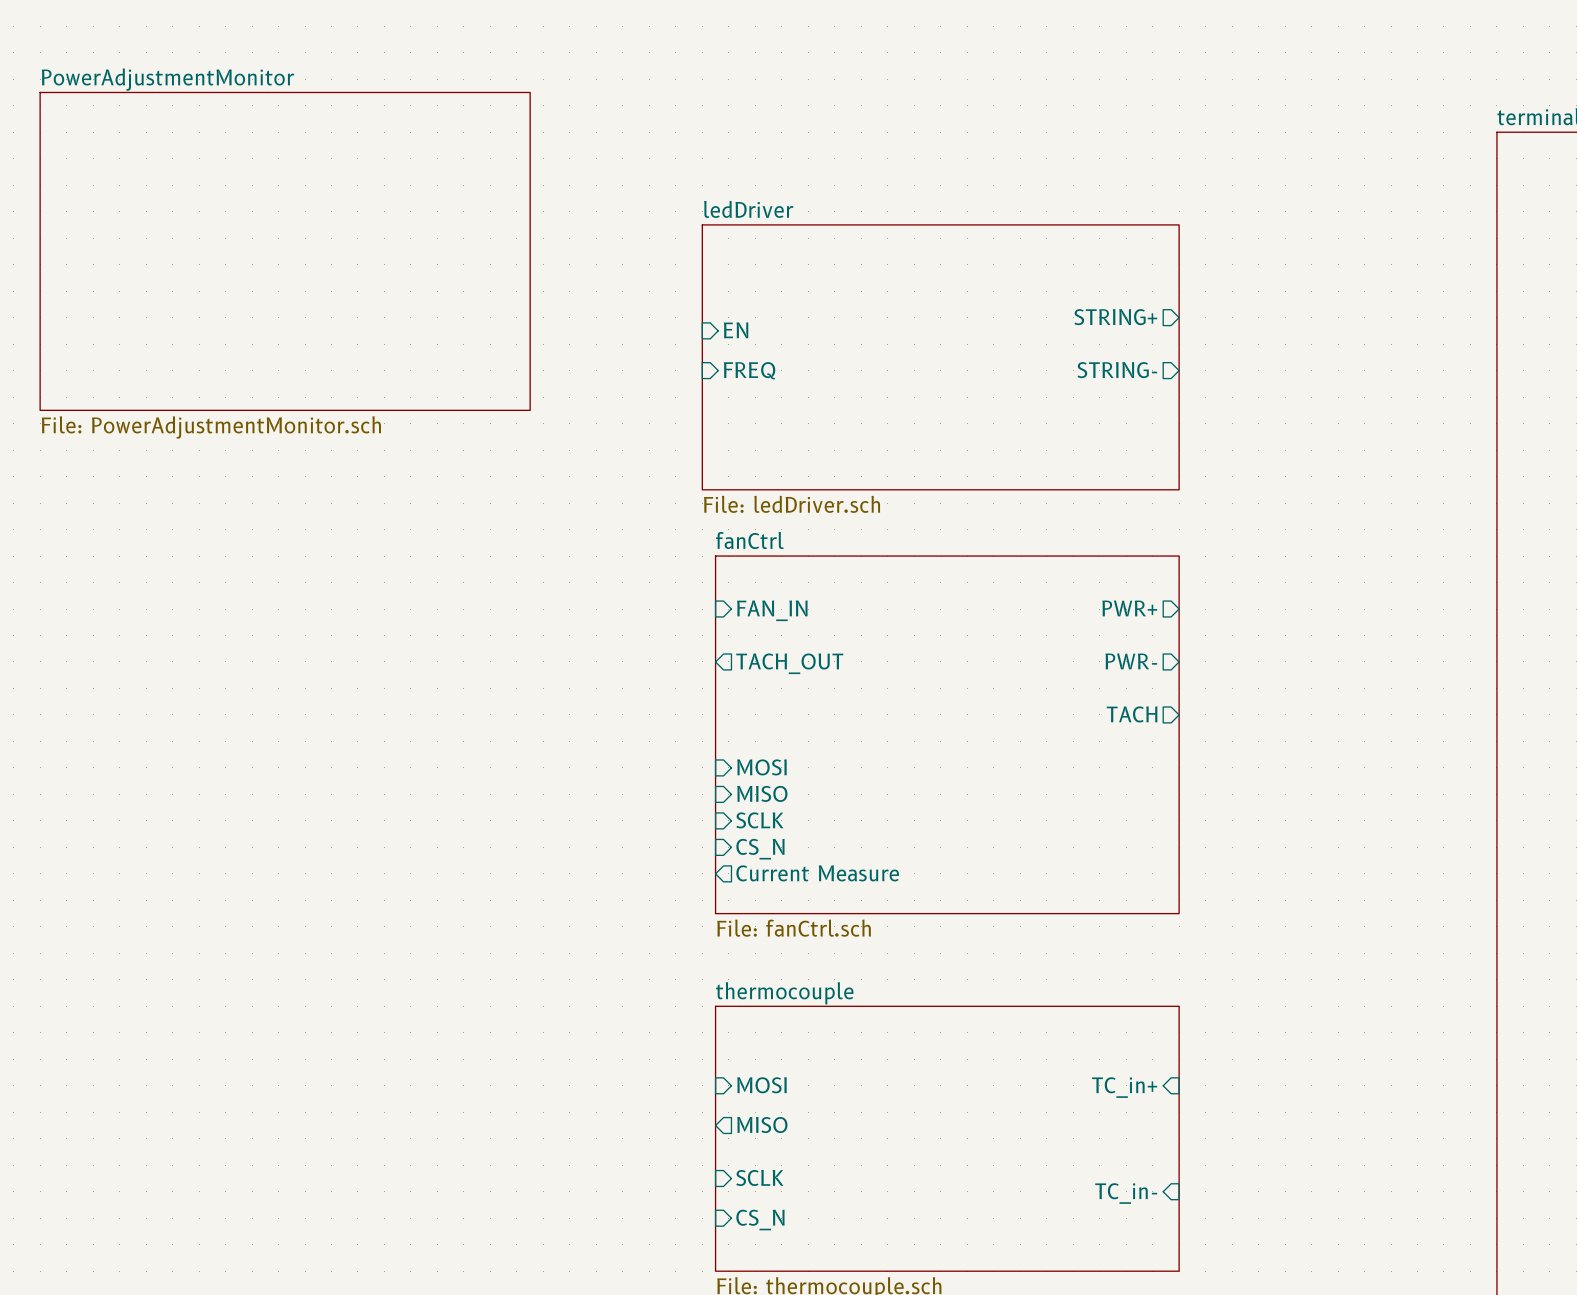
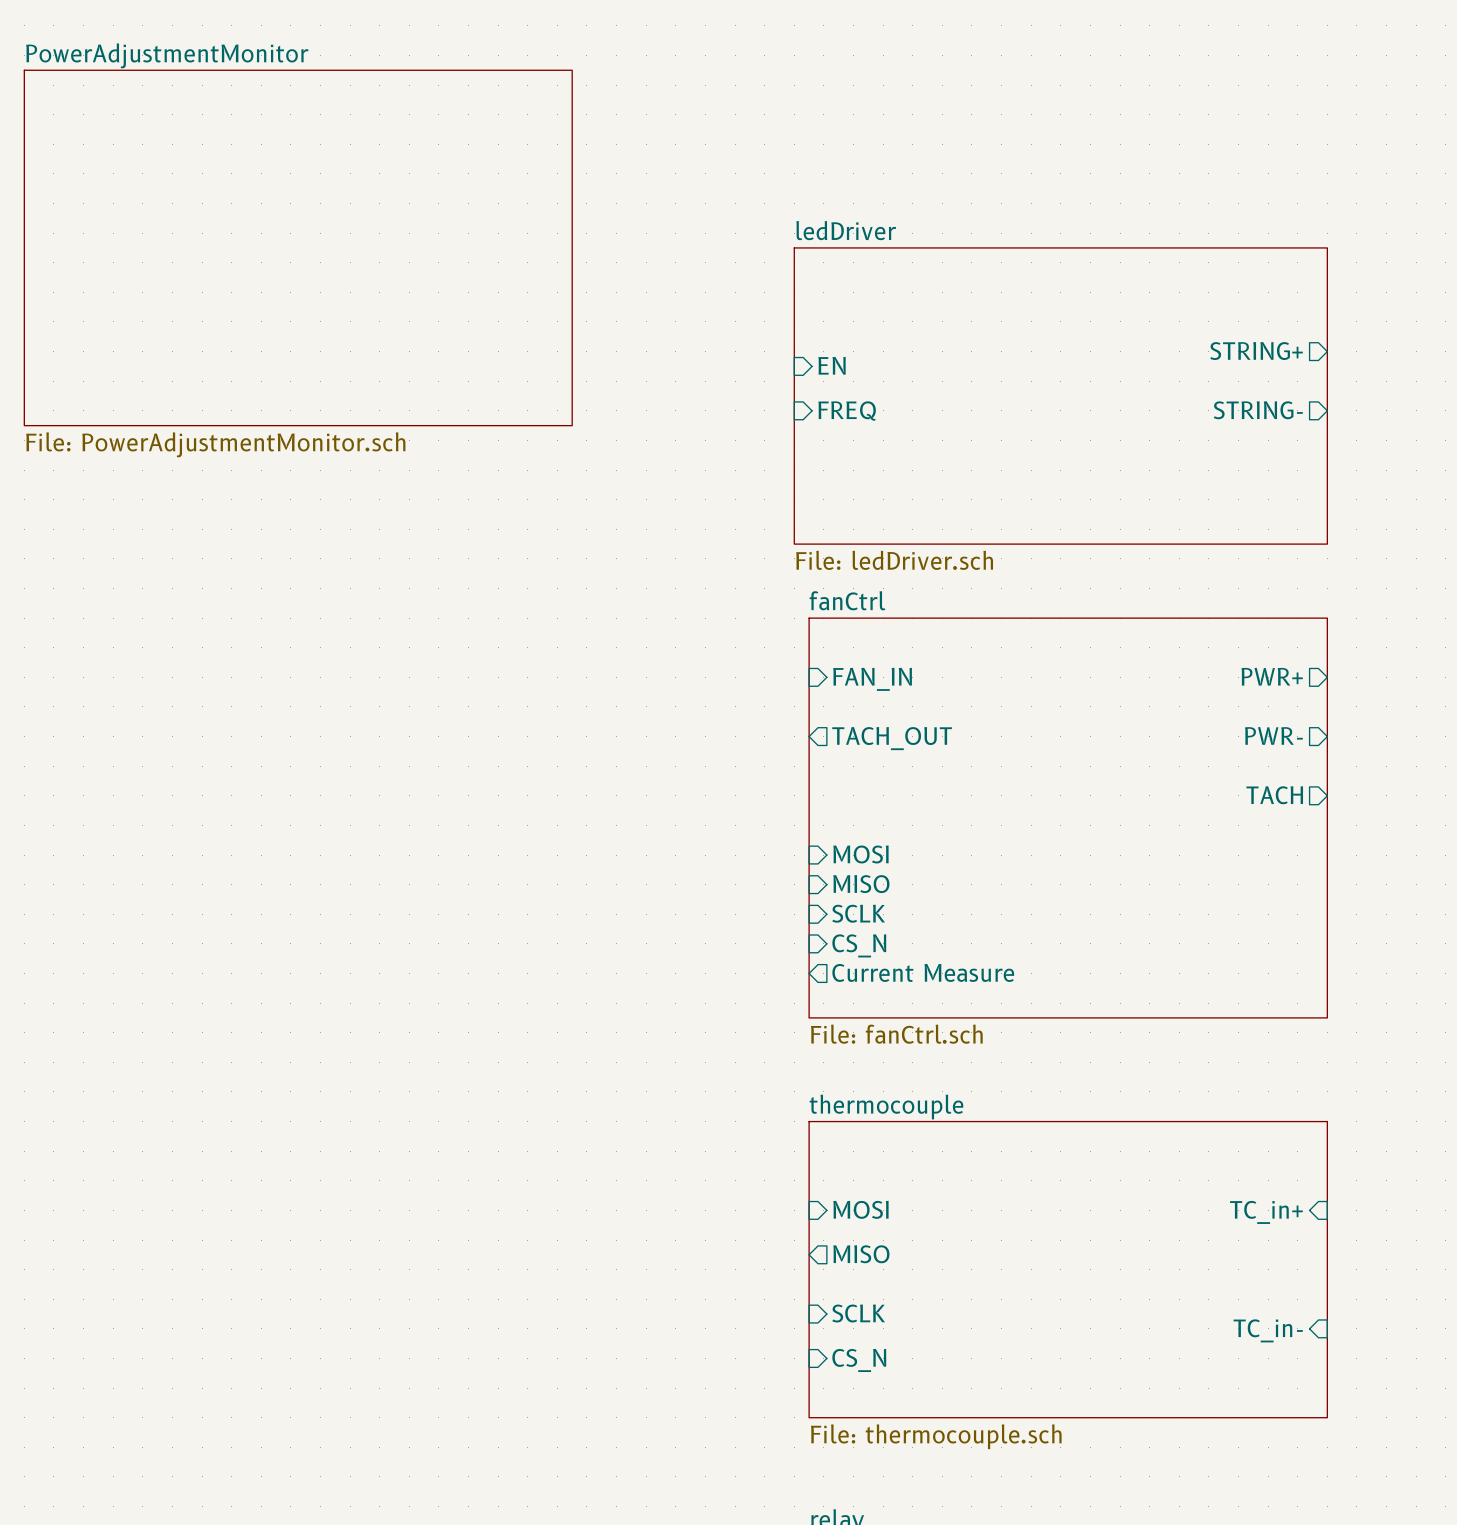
sheet PowerAdjustmentMonitor position: (285, 251) -> (298, 247)

